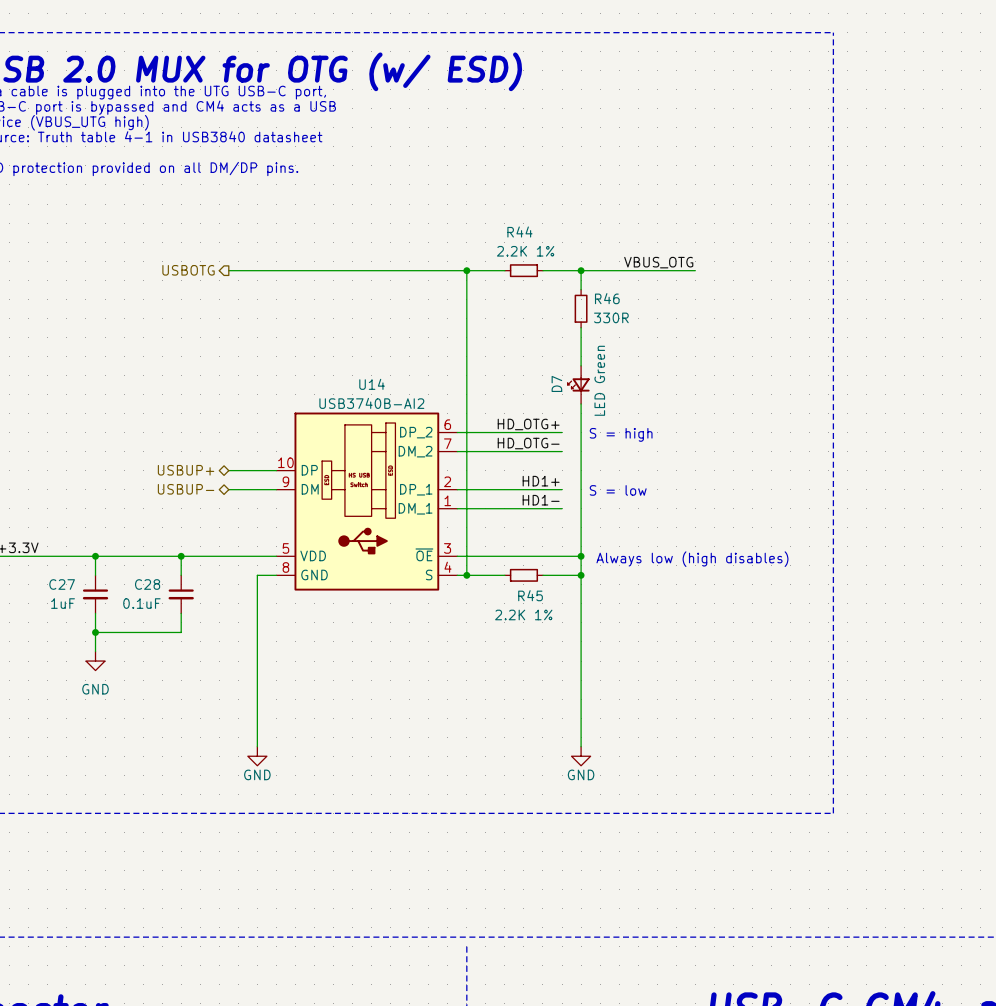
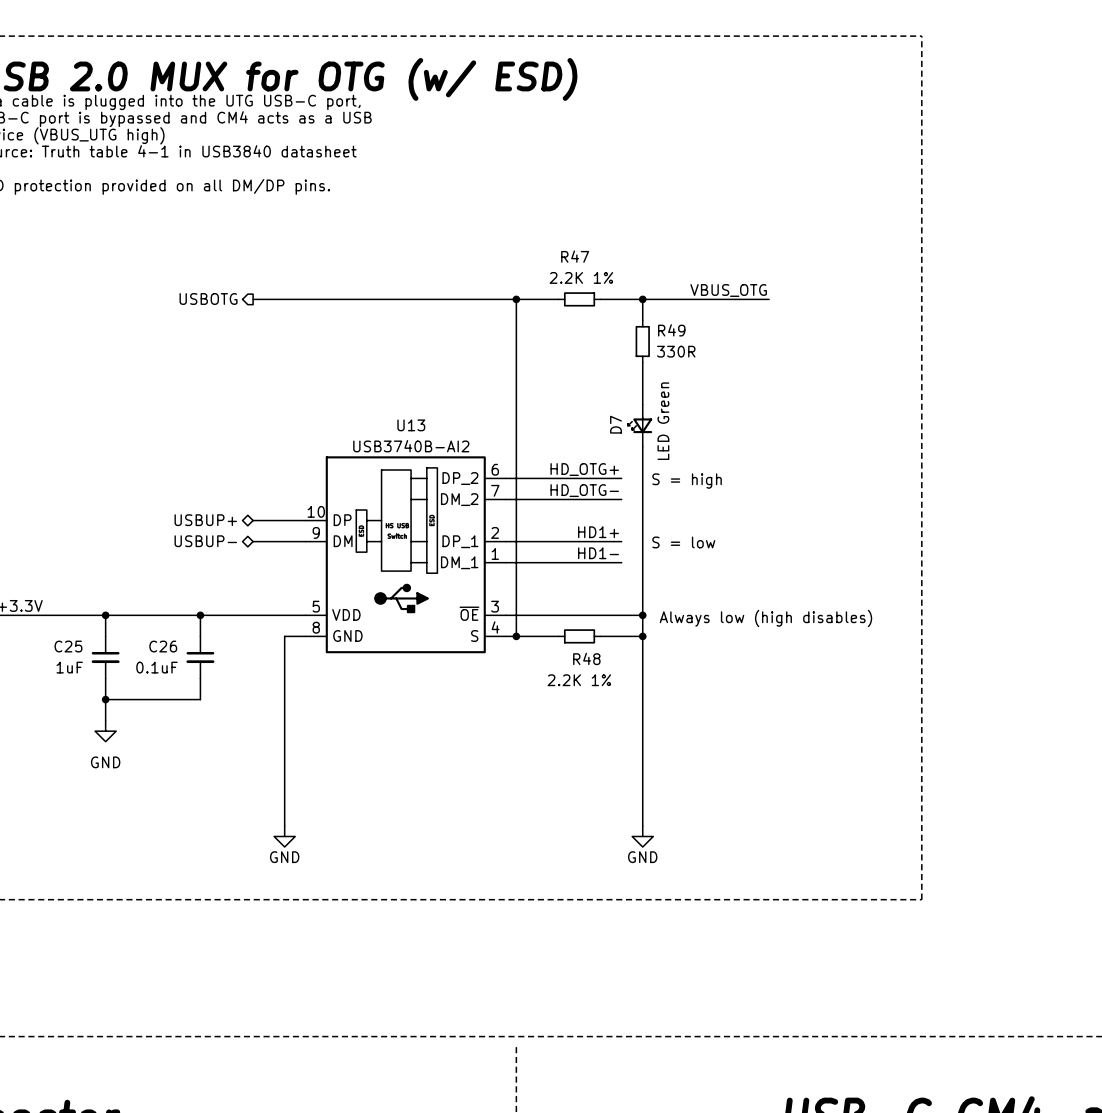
R44 name: R44 (519, 232) -> R47 (575, 256)
R46 name: R46 (607, 298) -> R49 (671, 330)
U14 name: U14 (372, 384) -> U13 (411, 425)
C27 name: C27 (62, 584) -> C25 (68, 646)
C28 name: C28 (147, 584) -> C26 (163, 646)
R45 name: R45 (530, 595) -> R48 (586, 658)

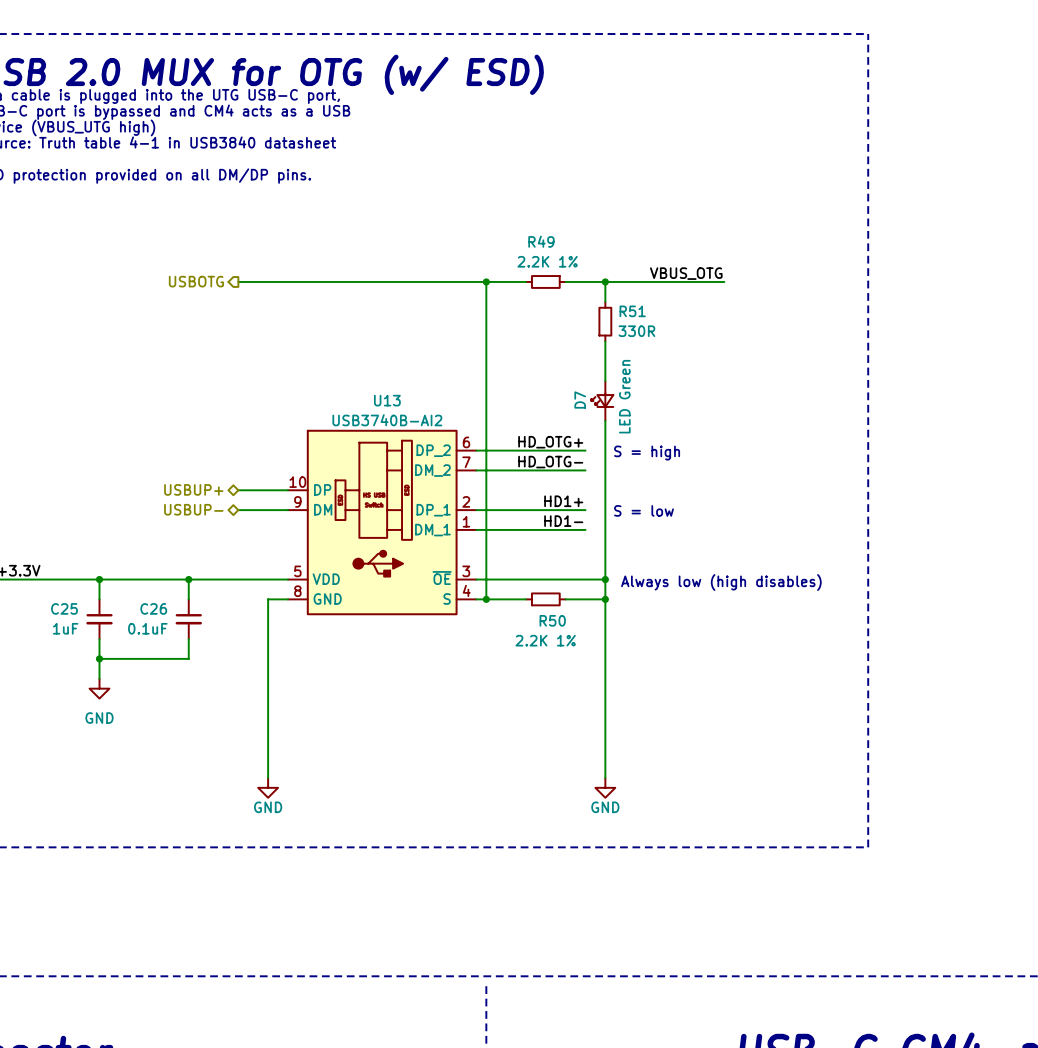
R47 name: R47 (575, 256) -> R49 (541, 241)
R49 name: R49 (671, 330) -> R51 (632, 311)
R48 name: R48 (586, 658) -> R50 (552, 620)

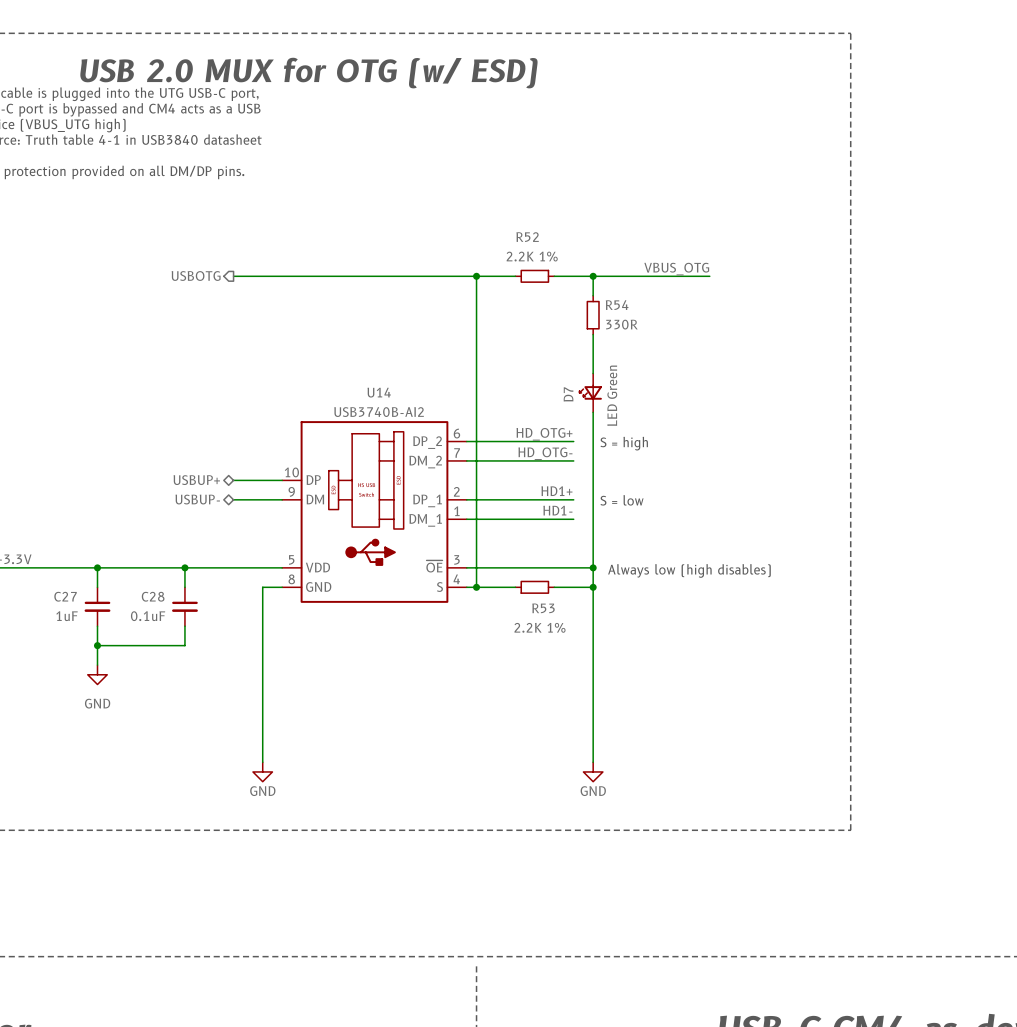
R49 name: R49 (541, 241) -> R52 (527, 237)
R51 name: R51 (632, 311) -> R54 (617, 305)
U13 name: U13 (387, 400) -> U14 (379, 392)
C25 name: C25 (64, 608) -> C27 (65, 596)
C26 name: C26 (153, 608) -> C28 (153, 596)
R50 name: R50 (552, 620) -> R53 (543, 608)

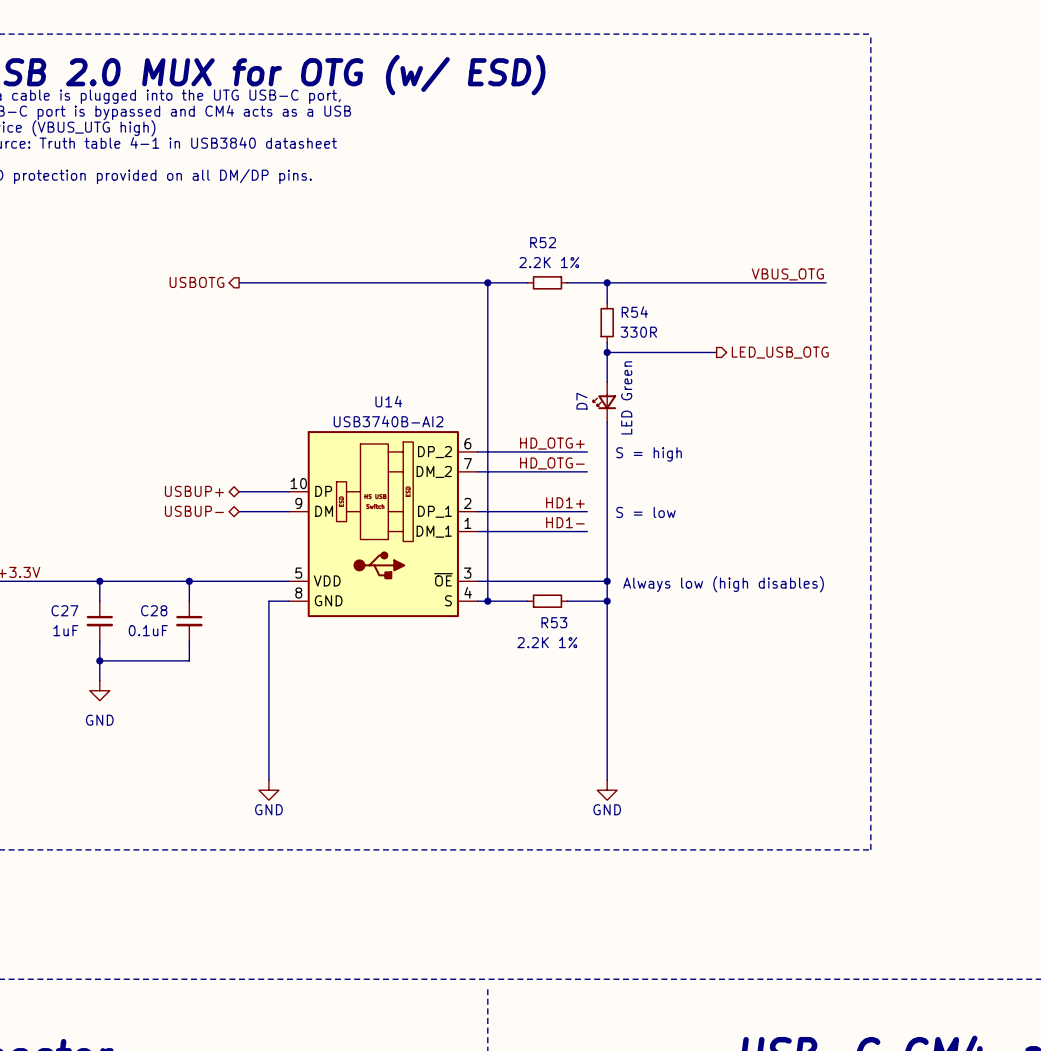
label position: VBUS_OTG (676, 269) -> VBUS_OTG (787, 274)
wire: none -> (726, 282) (826, 282)
wire: none -> (607, 352) (716, 352)
junction: none -> (607, 352)
hierarchical label: none -> LED_USB_OTG (780, 352)

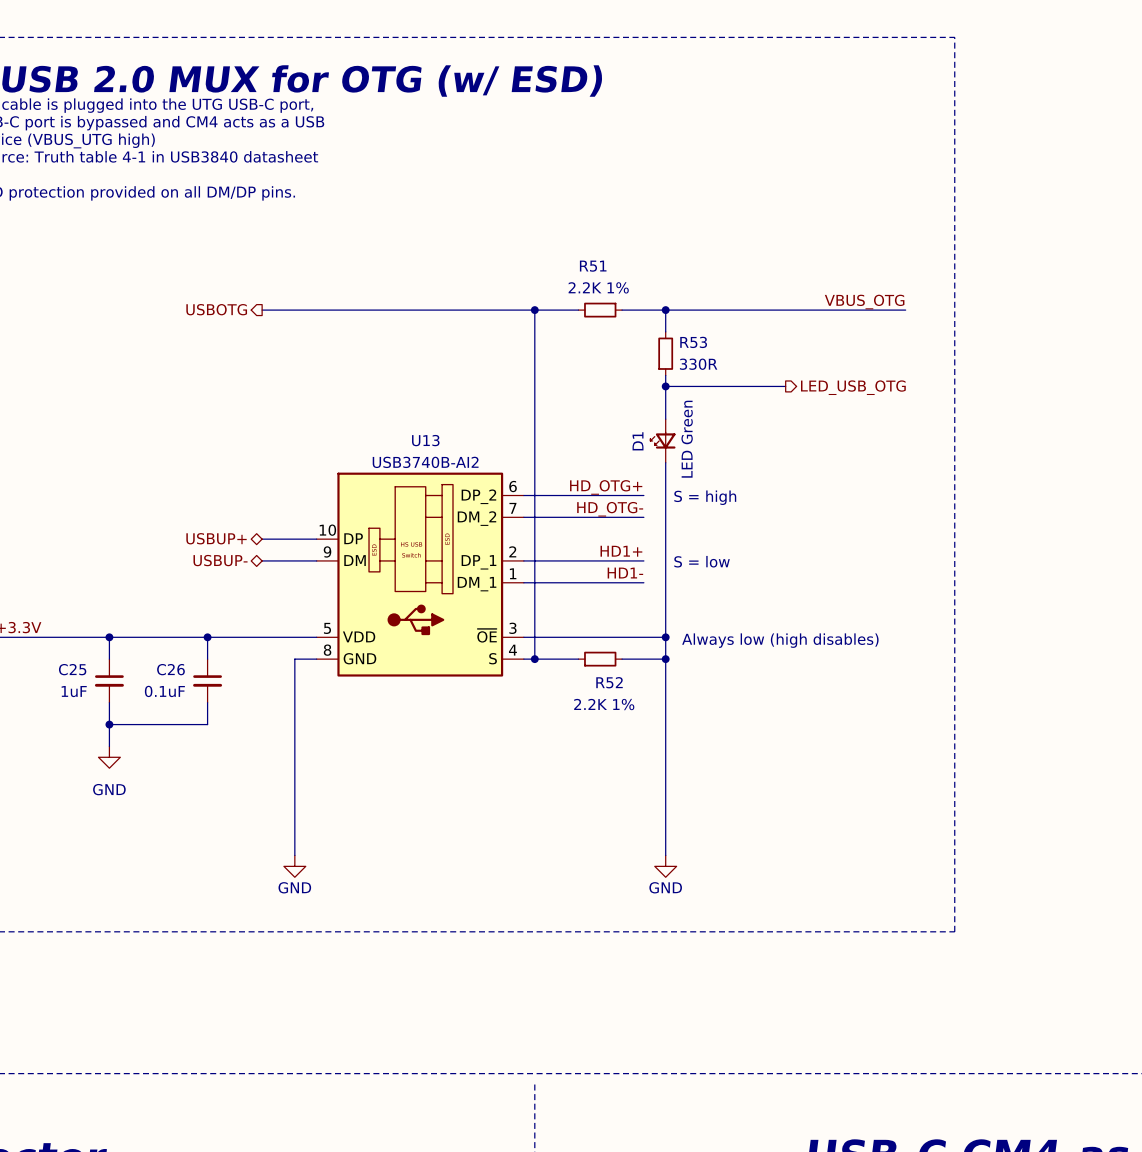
R52 name: R52 (543, 242) -> R51 (593, 266)
R54 name: R54 (634, 312) -> R53 (693, 342)
U14 name: U14 (388, 401) -> U13 (425, 440)
D7 name: D7 (581, 401) -> D1 (638, 441)
C27 name: C27 (64, 610) -> C25 (72, 669)
C28 name: C28 (154, 610) -> C26 (170, 669)
R53 name: R53 (554, 622) -> R52 (609, 682)

